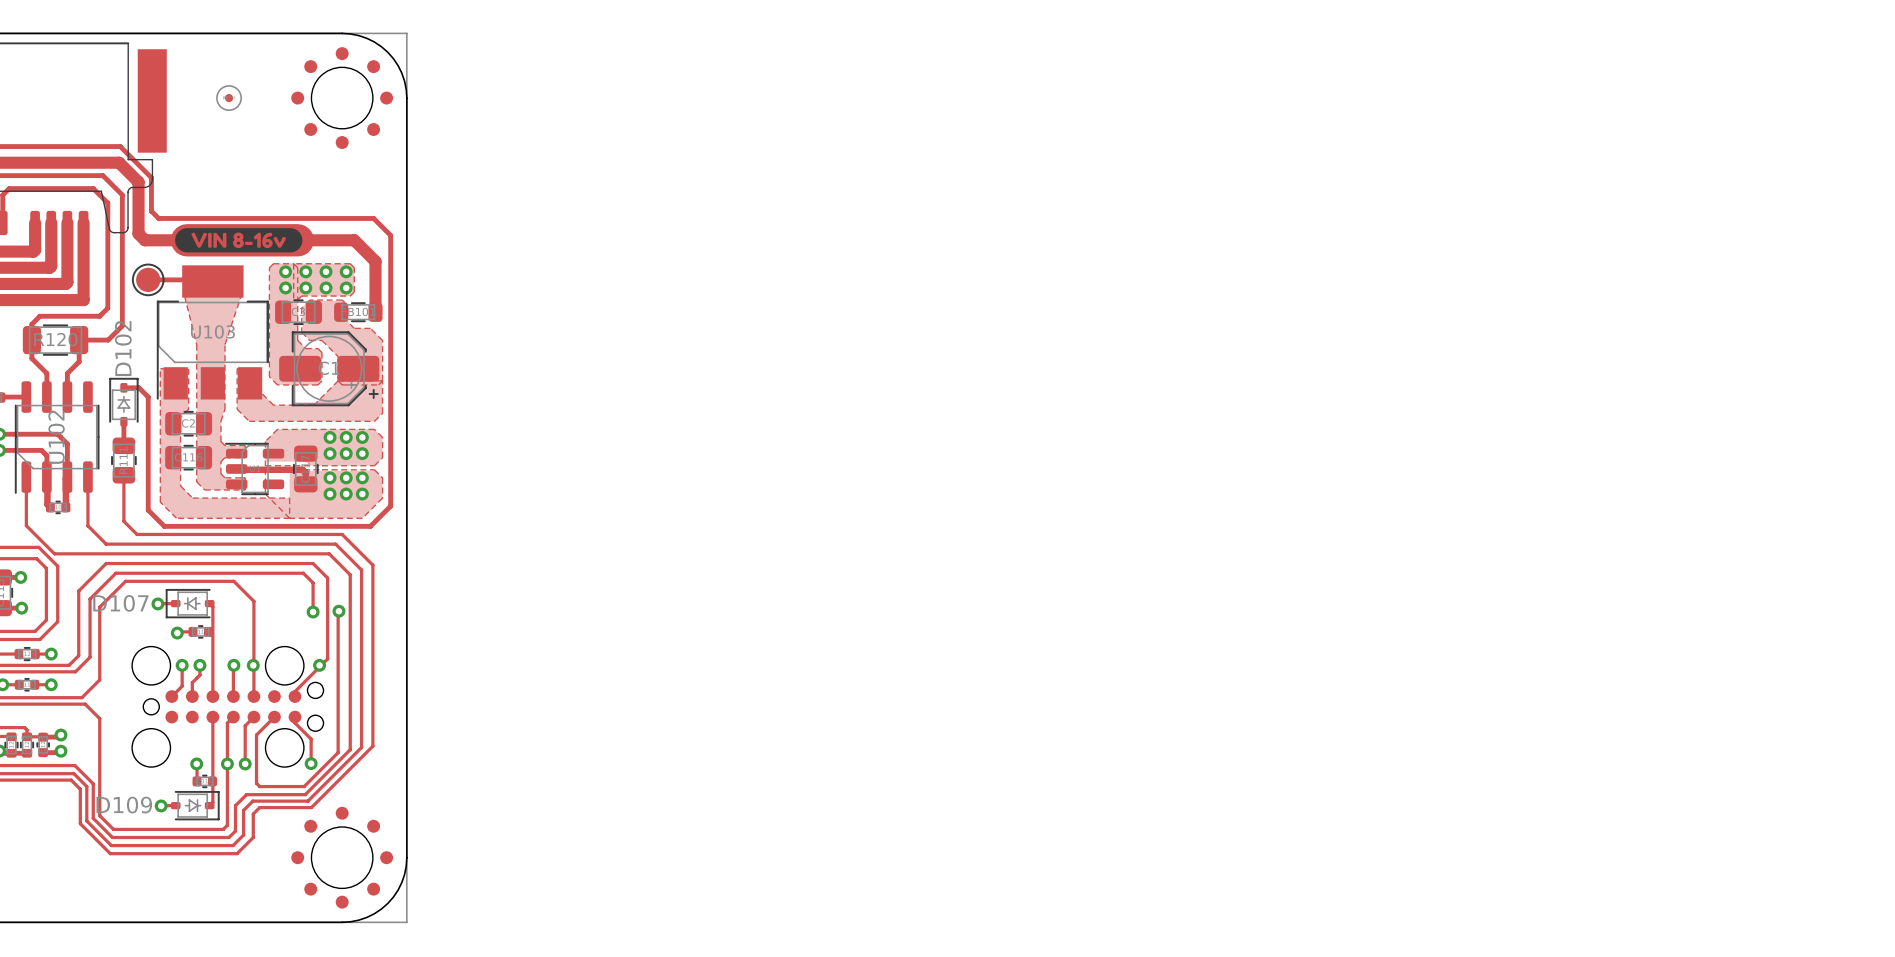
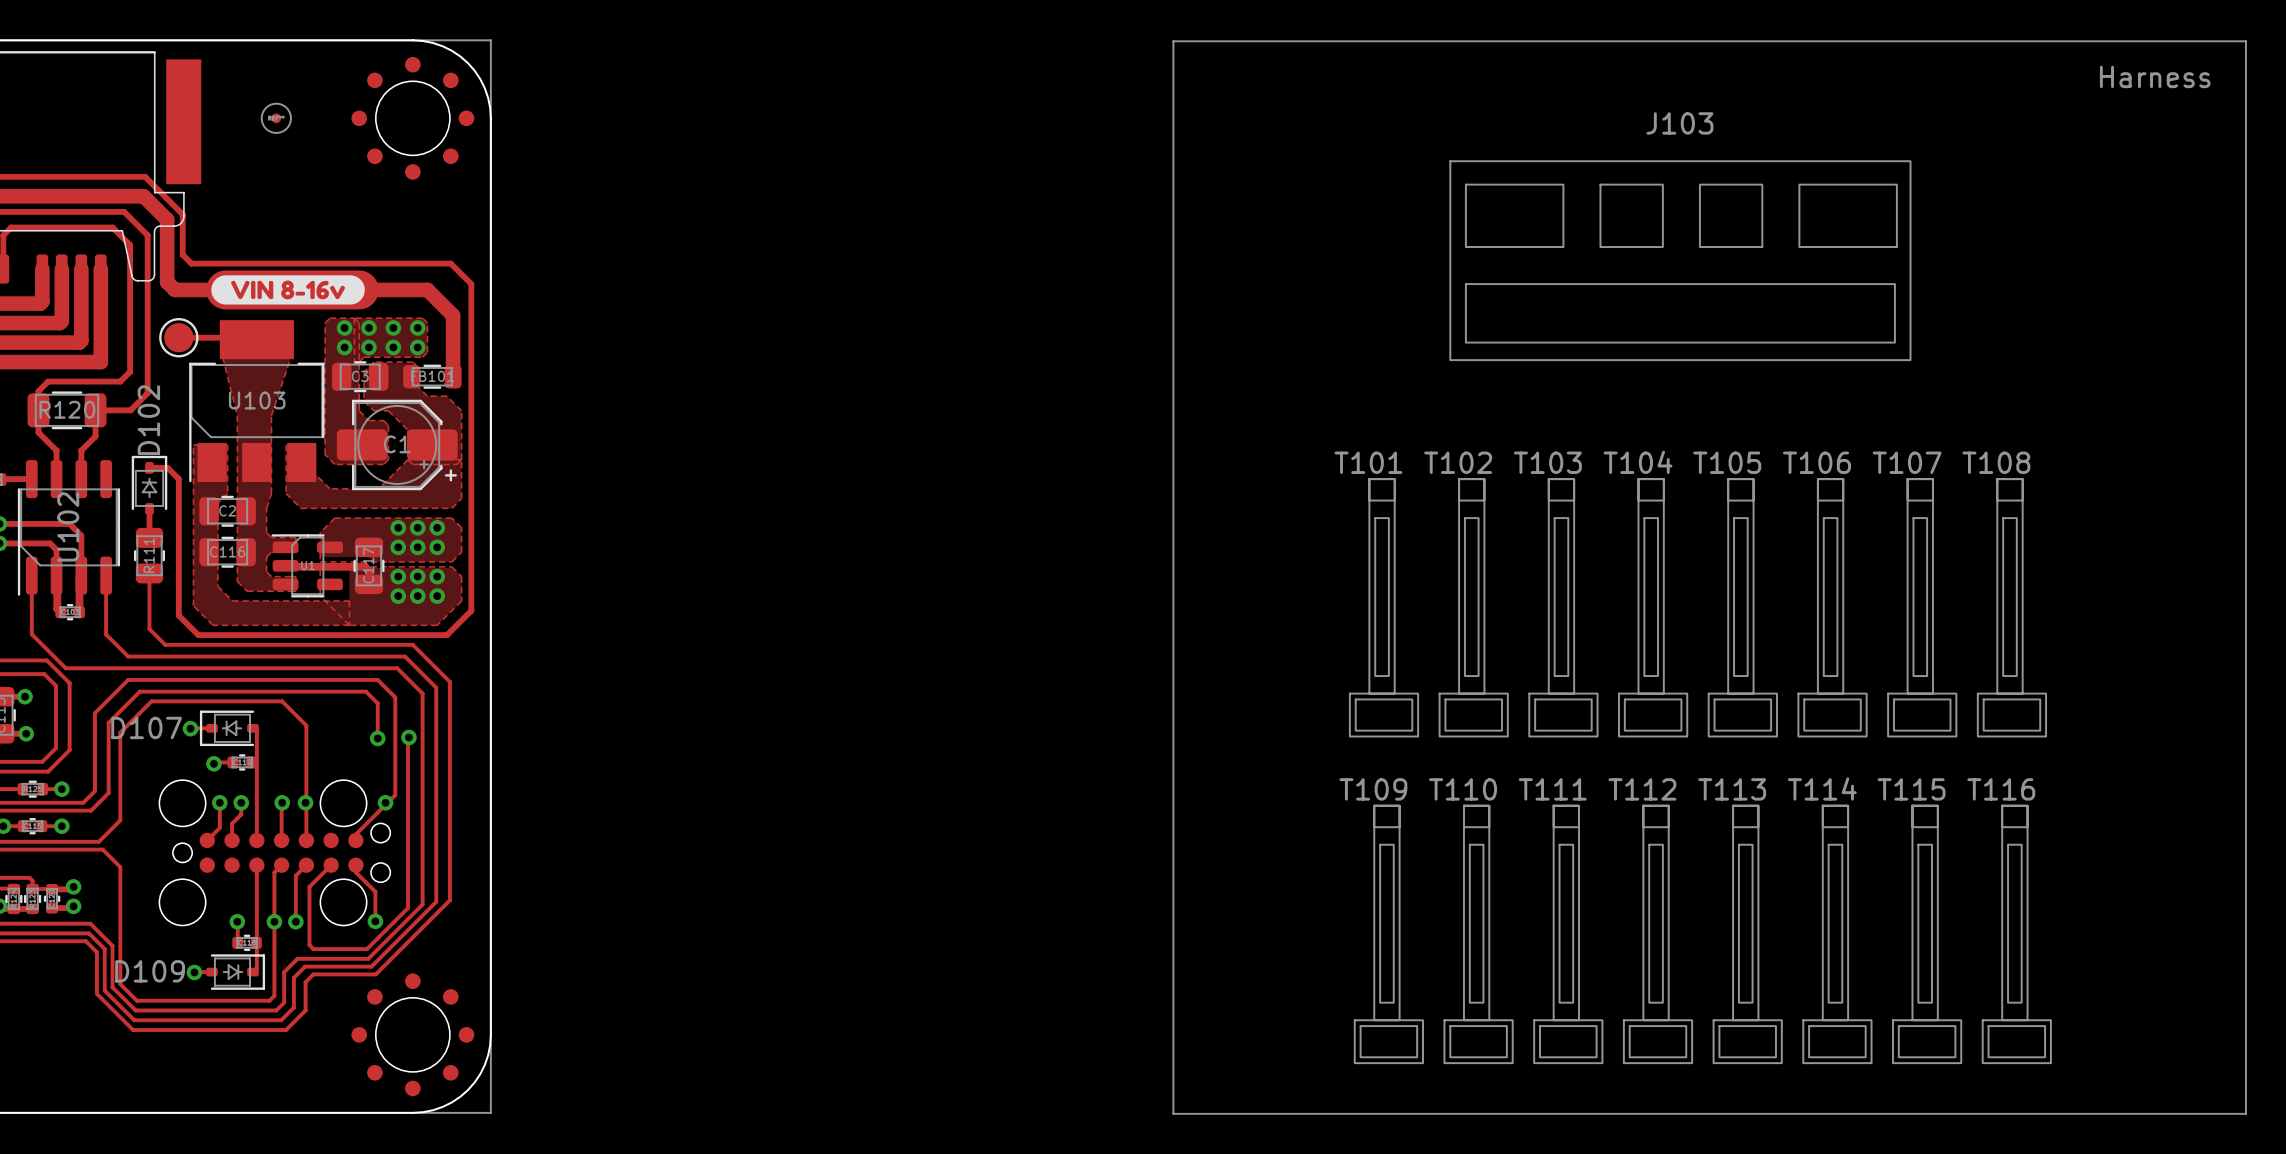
line: none -> (1173, 41) (2245, 41) (2245, 1113) (1173, 1113) (1173, 41)
text: none -> Harness (2155, 76)
J103: none -> (1680, 260)
T101: none -> (1384, 607)
T102: none -> (1473, 607)
T103: none -> (1563, 607)
T104: none -> (1653, 607)
T105: none -> (1742, 607)
T106: none -> (1832, 607)
T107: none -> (1922, 607)
T108: none -> (2011, 607)
T109: none -> (1388, 934)
T110: none -> (1478, 934)
T111: none -> (1568, 934)
T112: none -> (1657, 934)
T113: none -> (1747, 934)
T114: none -> (1837, 934)
T115: none -> (1927, 934)
T116: none -> (2016, 934)

